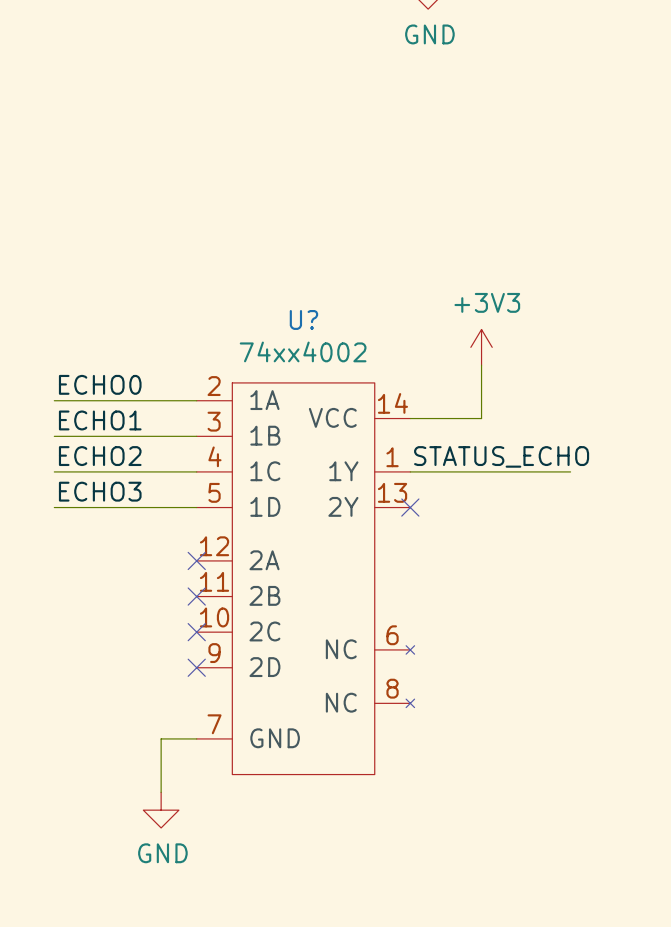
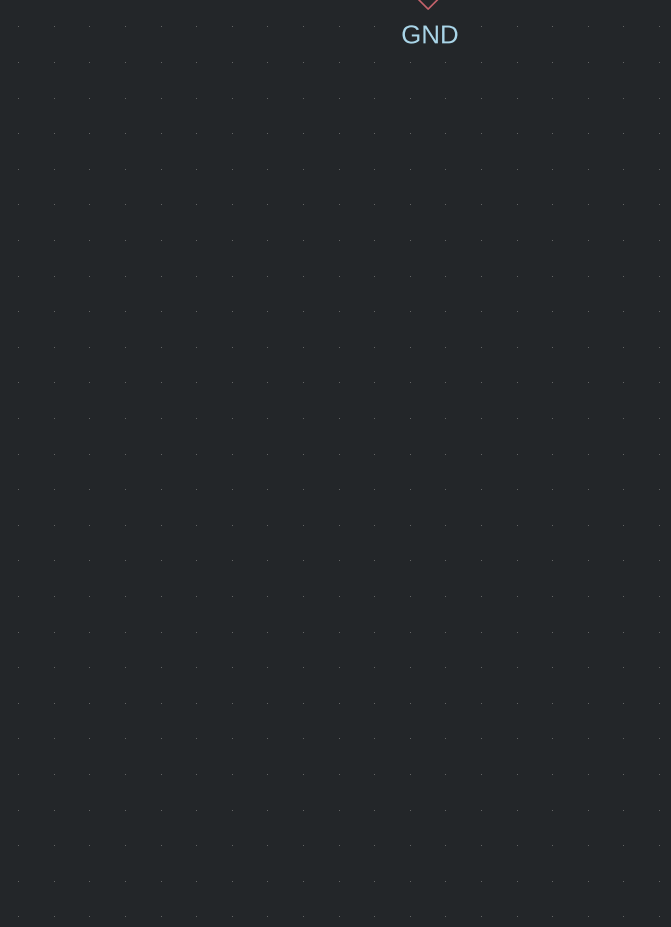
power symbol: +3V3 (481, 347) -> none
wire: (481, 365) (481, 418) (410, 418) -> none
label: ECHO0 (100, 384) -> none
wire: (54, 400) (196, 400) -> none
label: ECHO1 (100, 420) -> none
wire: (54, 436) (196, 436) -> none
label: ECHO2 (100, 456) -> none
label: STATUS_ECHO (501, 456) -> none
wire: (54, 471) (196, 471) -> none
wire: (410, 471) (570, 471) -> none
label: ECHO3 (100, 491) -> none
wire: (54, 507) (196, 507) -> none
no-connect mark: (410, 507) -> none
no-connect mark: (196, 560) -> none
U?: 74xx4002 (305, 578) -> none
no-connect mark: (196, 596) -> none
no-connect mark: (196, 632) -> none
no-connect mark: (196, 667) -> none
wire: (196, 738) (161, 738) (161, 792) -> none
power symbol: GND (161, 810) -> none

